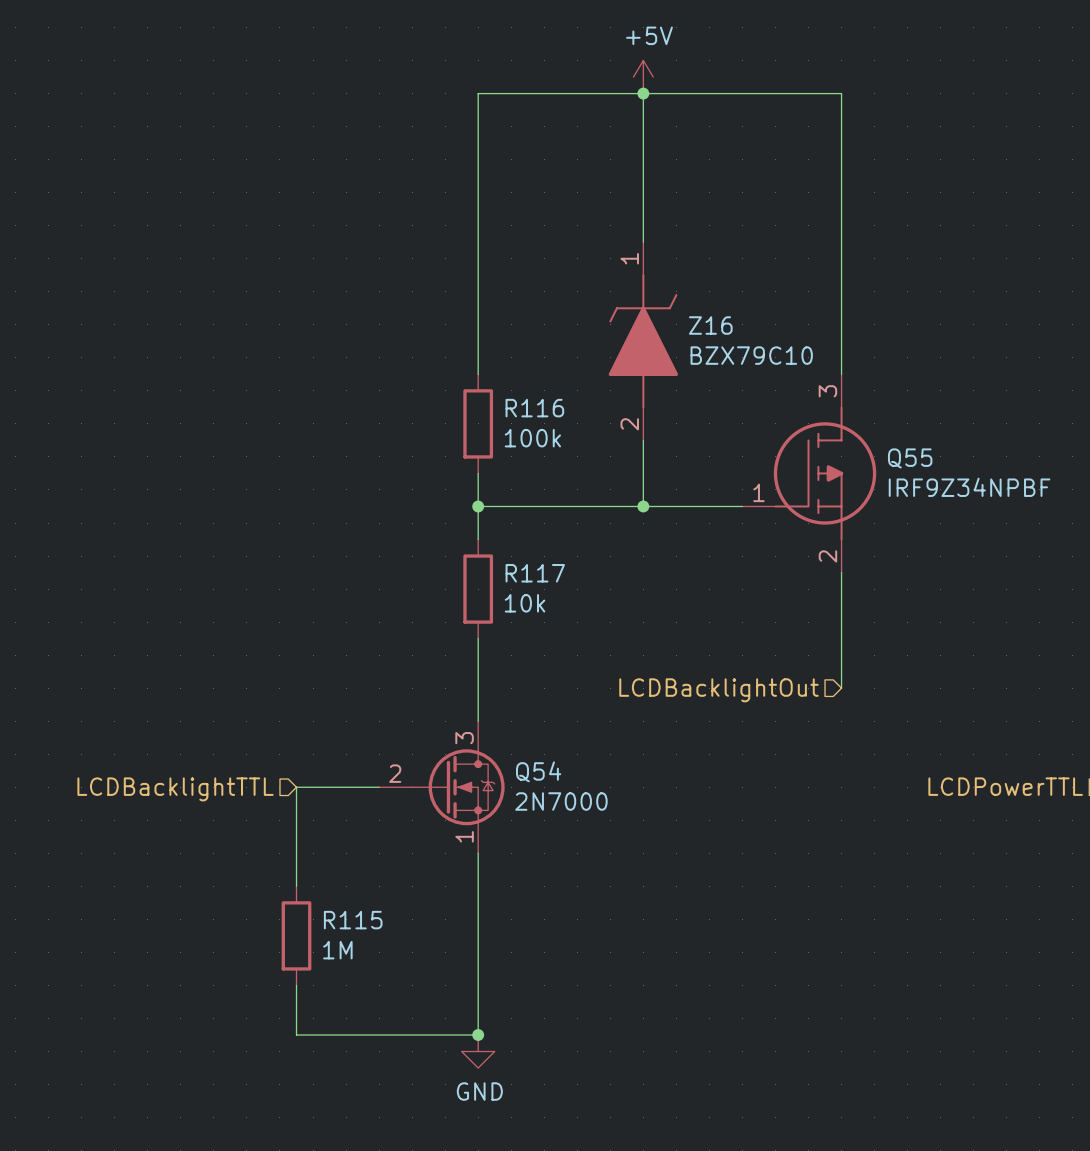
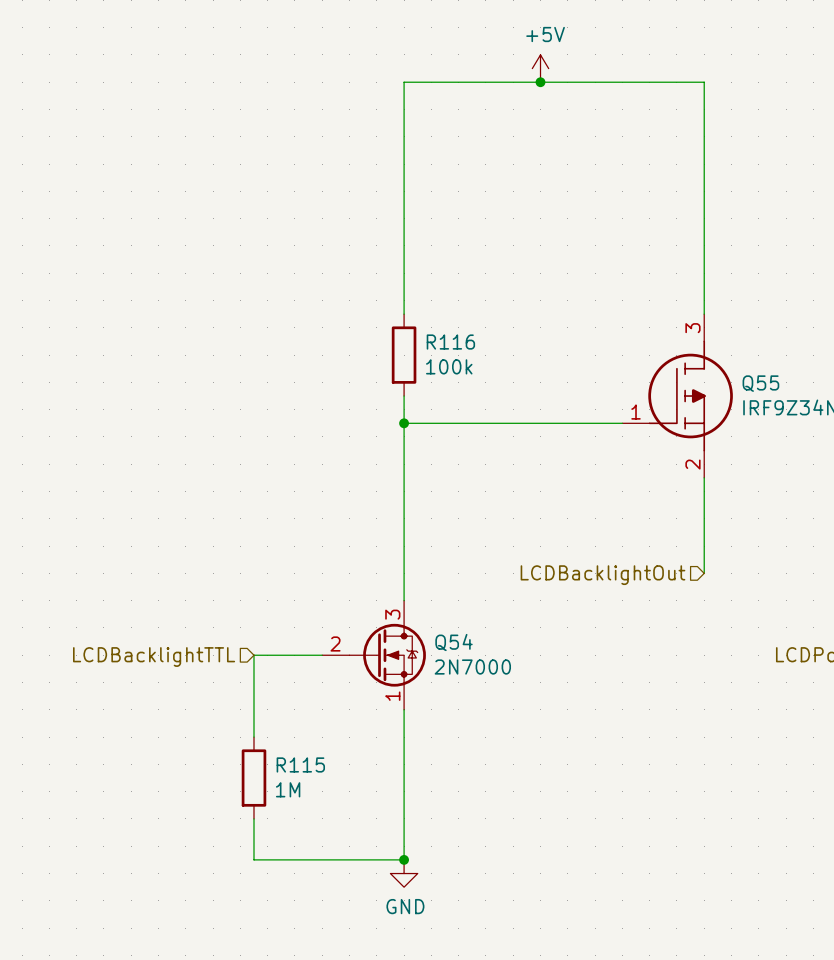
wire: (643, 93) (643, 242) -> none
Z16: BZX79C10 (643, 341) -> none
wire: (643, 440) (643, 506) -> none
junction: (643, 506) -> none
wire: none -> (404, 450) (404, 532)
R117: 10k (478, 589) -> none

